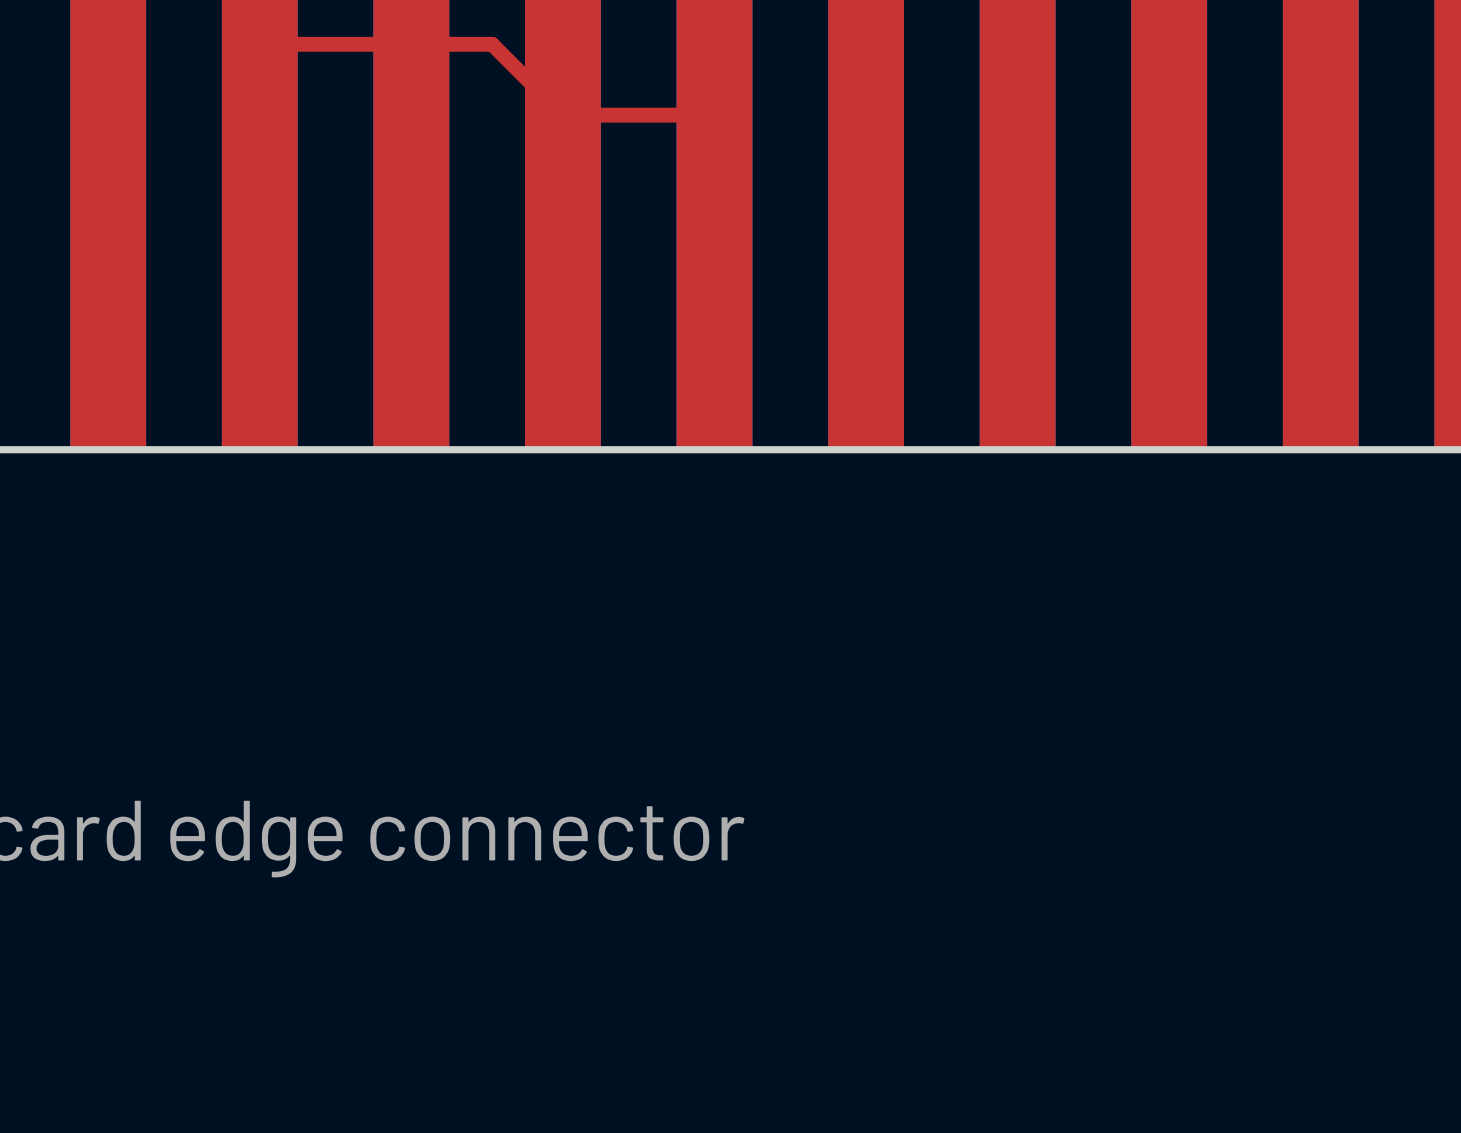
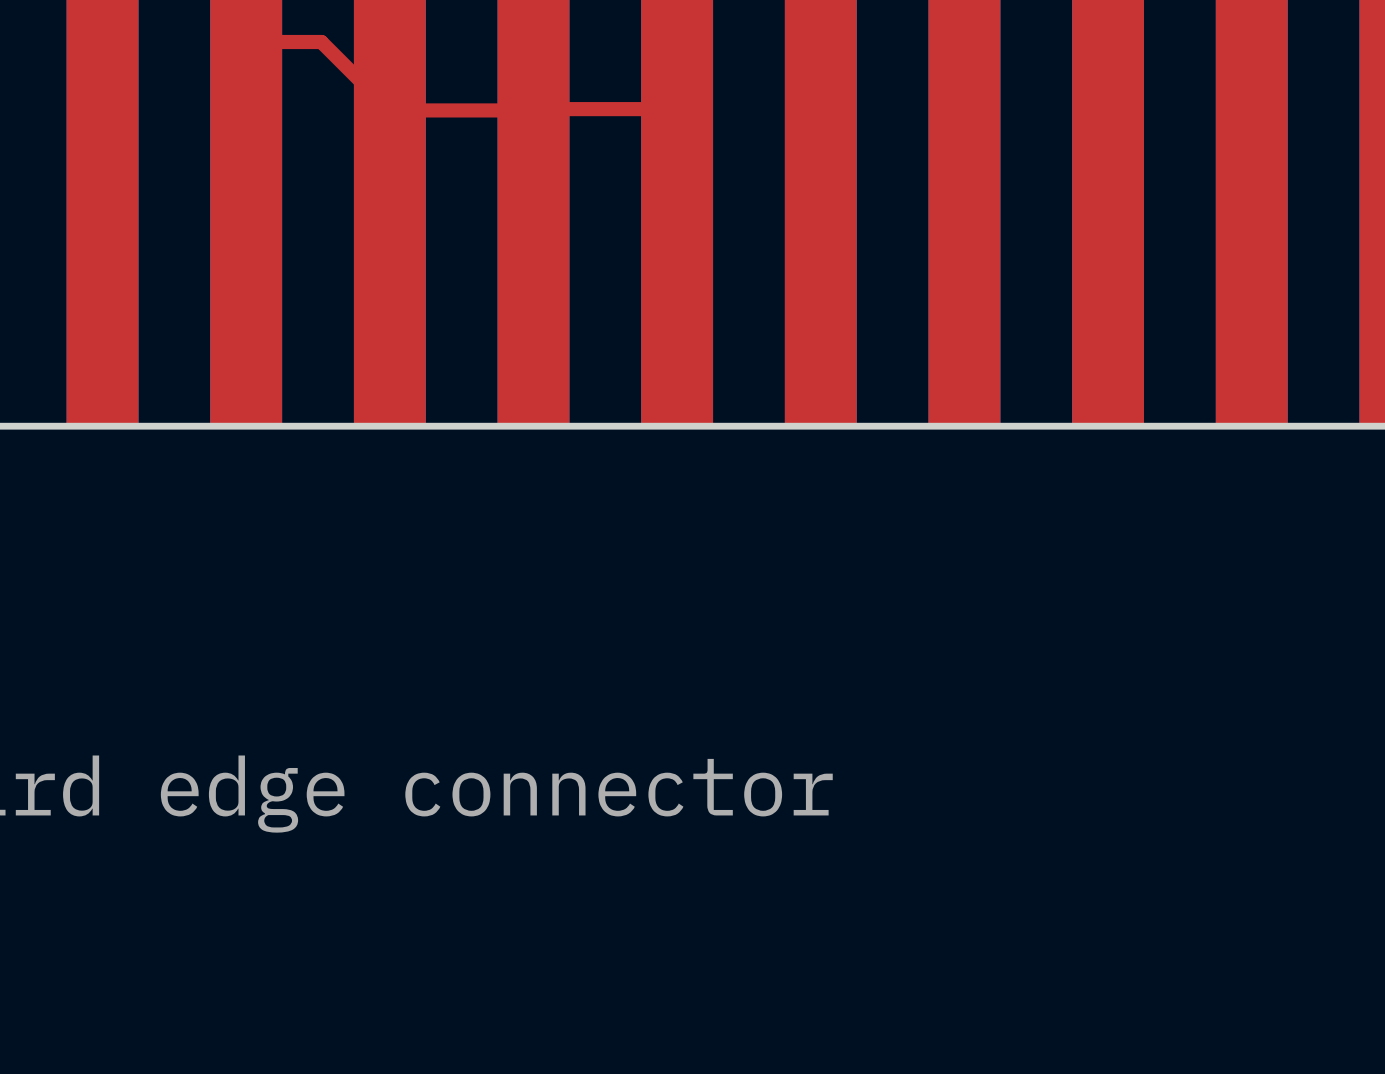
top track: (339, 44) (492, 44) (562, 115) -> (321, 42) (389, 110) (533, 110)

